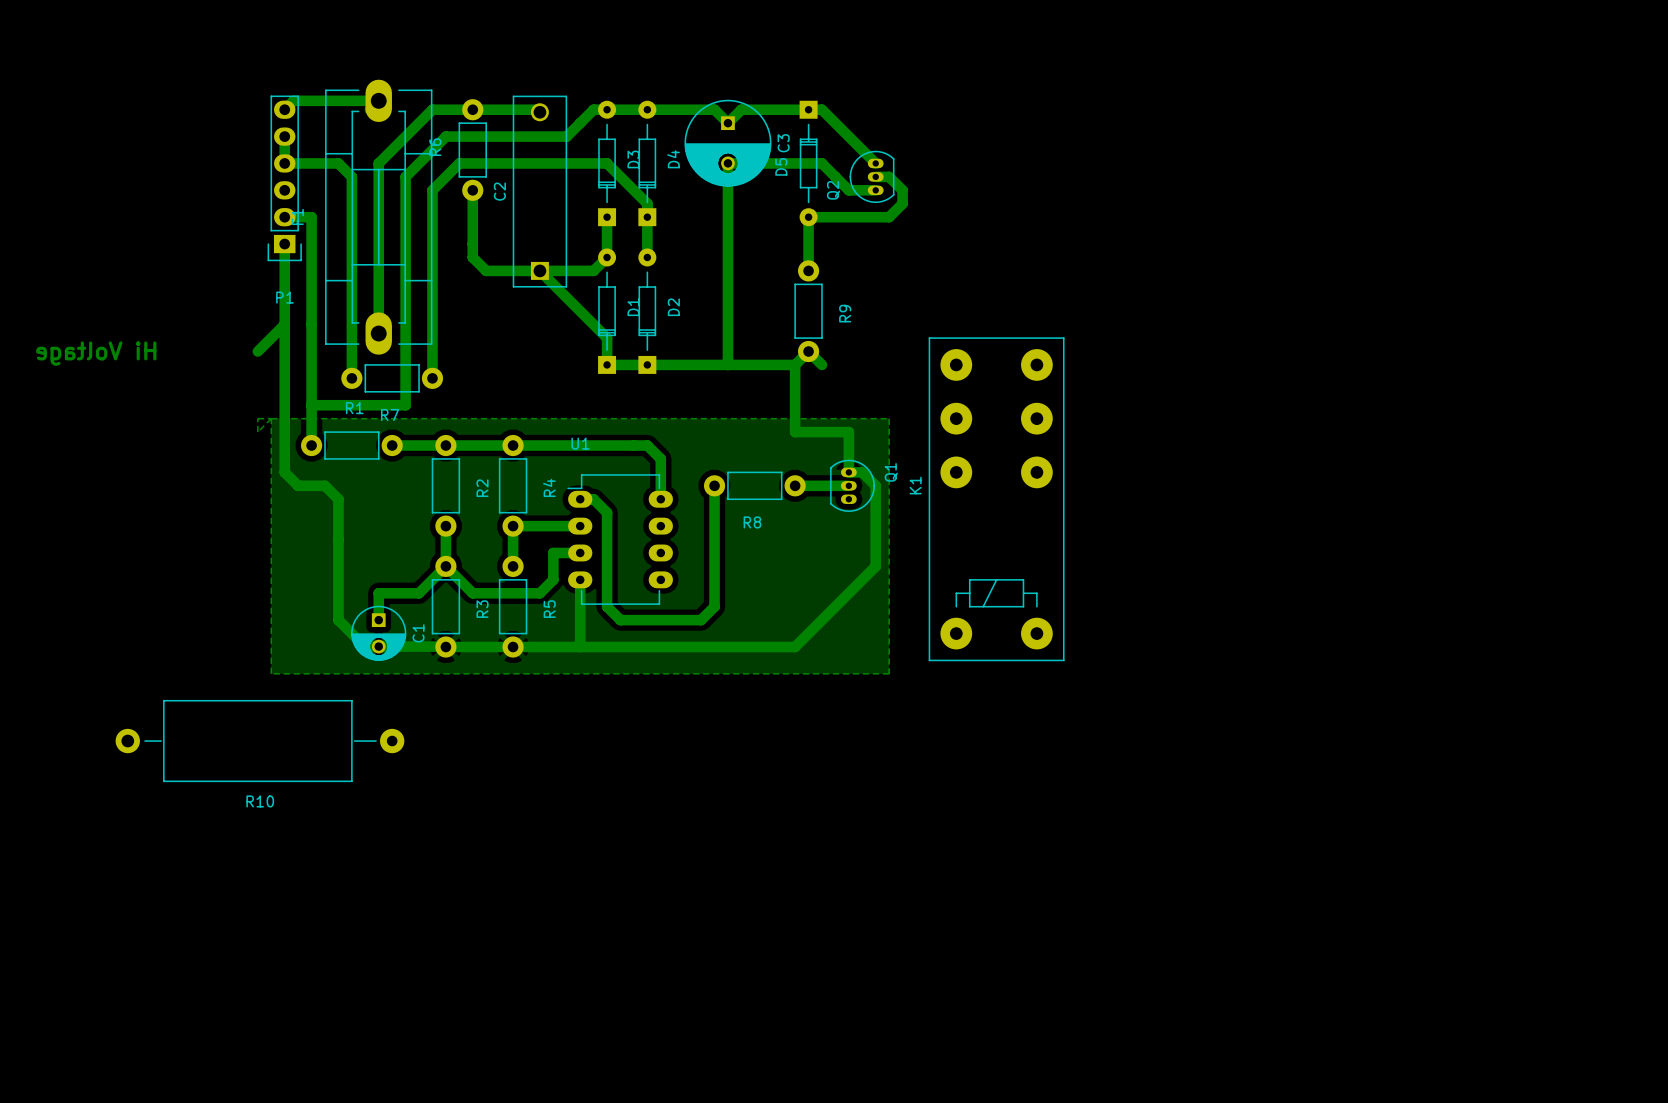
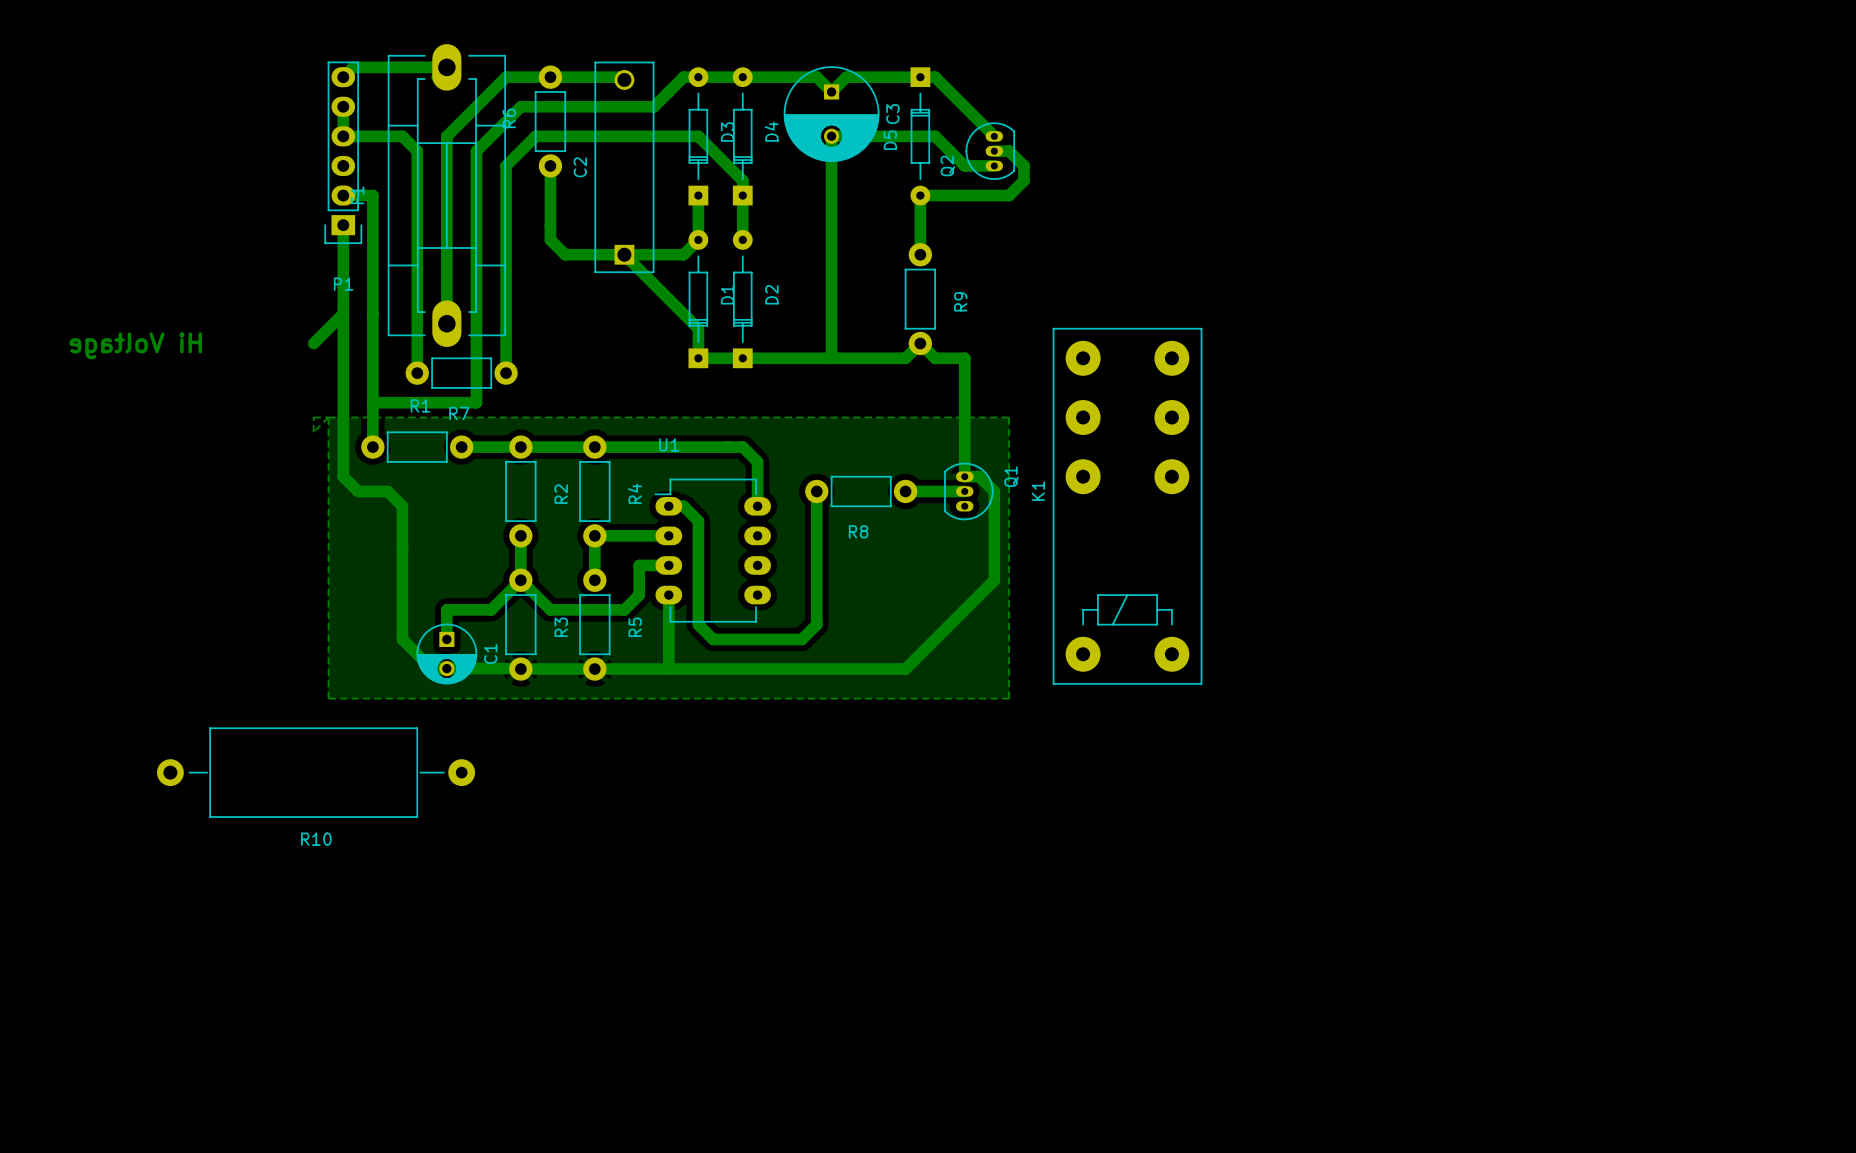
bottom track: (795, 364) (795, 432) (848, 432) -> (935, 358) (964, 358) (964, 432)

